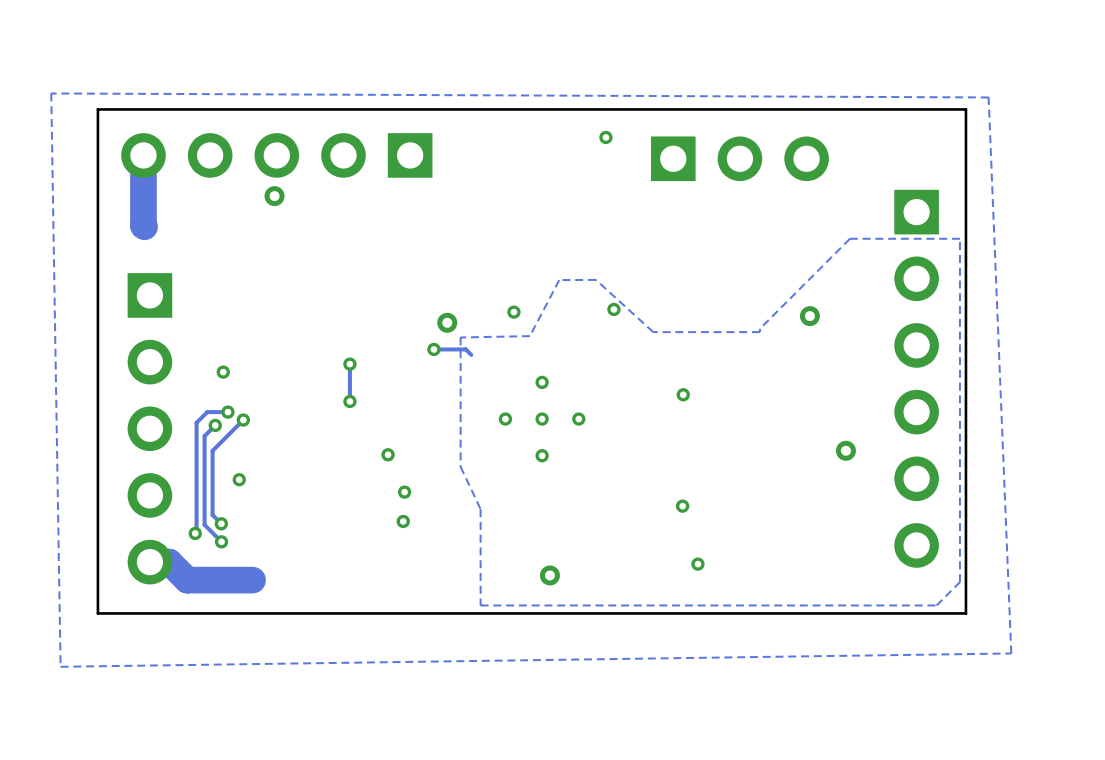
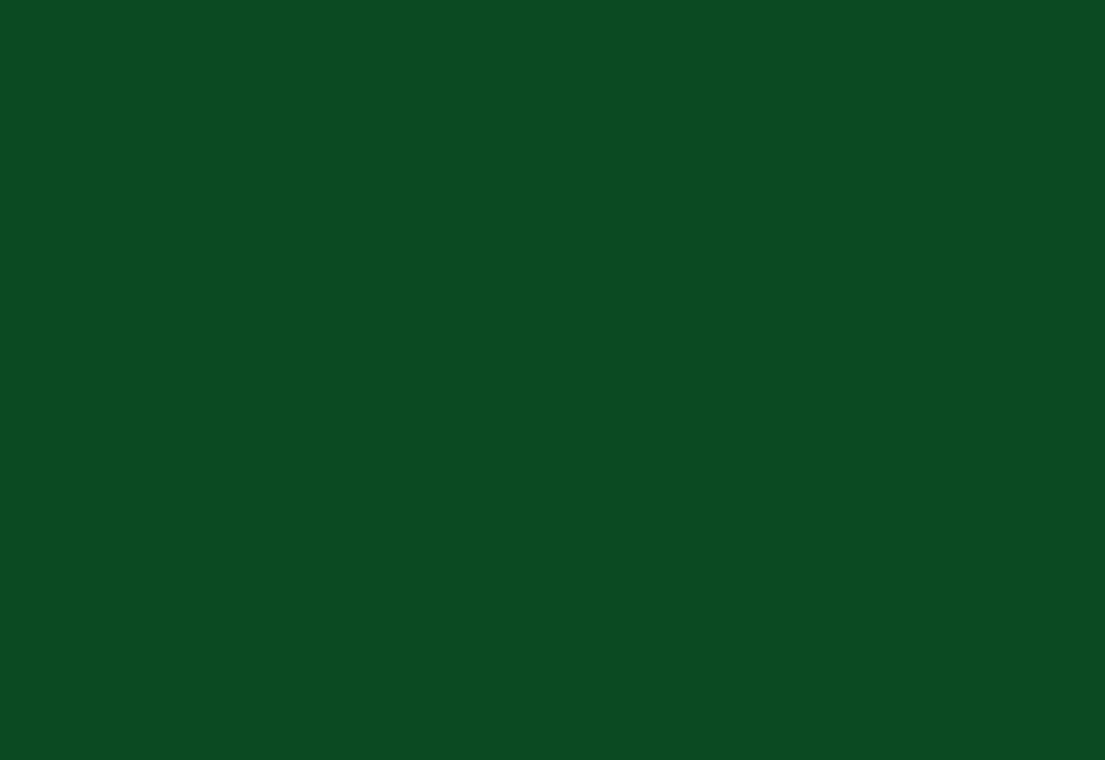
zone outline: (51, 93) (988, 97) (1011, 653) (60, 666) (51, 93) -> none
board edge: (965, 109) (97, 109) (97, 613) (965, 613) (965, 109) -> none
via: (605, 137) -> none
track: (143, 155) (144, 226) -> none
part: (276, 155) -> none
part: (739, 158) -> none
via: (274, 196) -> none
zone outline: (959, 238) (849, 238) (759, 328) (759, 332) (653, 332) (595, 279) (559, 280) (529, 336) (460, 337) (460, 466) (480, 509) (480, 605) (936, 605) (959, 582) (959, 238) -> none
via: (613, 309) -> none
via: (513, 312) -> none
via: (809, 316) -> none
via: (447, 322) -> none
track: (433, 349) (465, 349) (471, 354) -> none
via: (433, 349) -> none
track: (349, 364) (349, 398) -> none
via: (349, 364) -> none
via: (223, 372) -> none
part: (916, 378) -> none
via: (683, 394) -> none
via: (349, 401) -> none
track: (227, 412) (207, 412) (196, 422) (195, 533) -> none
via: (227, 412) -> none
part: (542, 419) -> none
track: (243, 420) (212, 450) (212, 515) (221, 523) -> none
via: (243, 420) -> none
track: (215, 425) (204, 436) (204, 524) (221, 541) -> none
via: (215, 425) -> none
part: (149, 428) -> none
via: (845, 450) -> none
via: (388, 454) -> none
via: (239, 479) -> none
via: (404, 492) -> none
via: (682, 506) -> none
via: (403, 521) -> none
via: (221, 523) -> none
via: (195, 533) -> none
via: (221, 541) -> none
track: (149, 562) (169, 562) (187, 580) (252, 580) -> none
via: (697, 564) -> none
via: (549, 575) -> none

